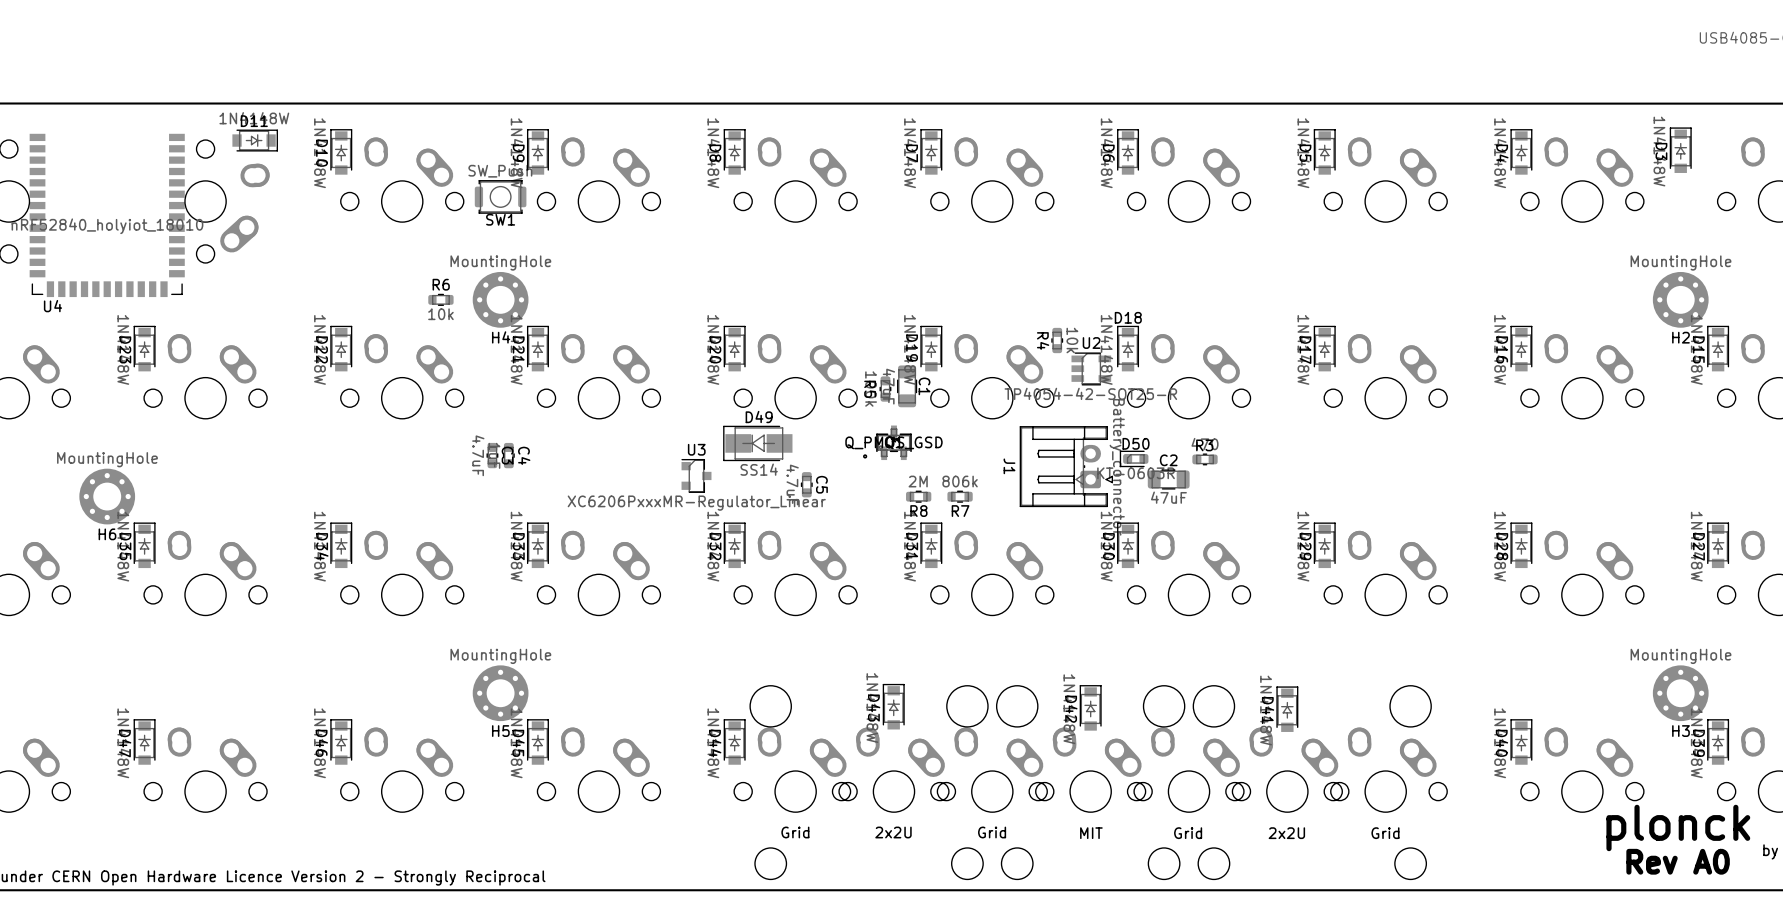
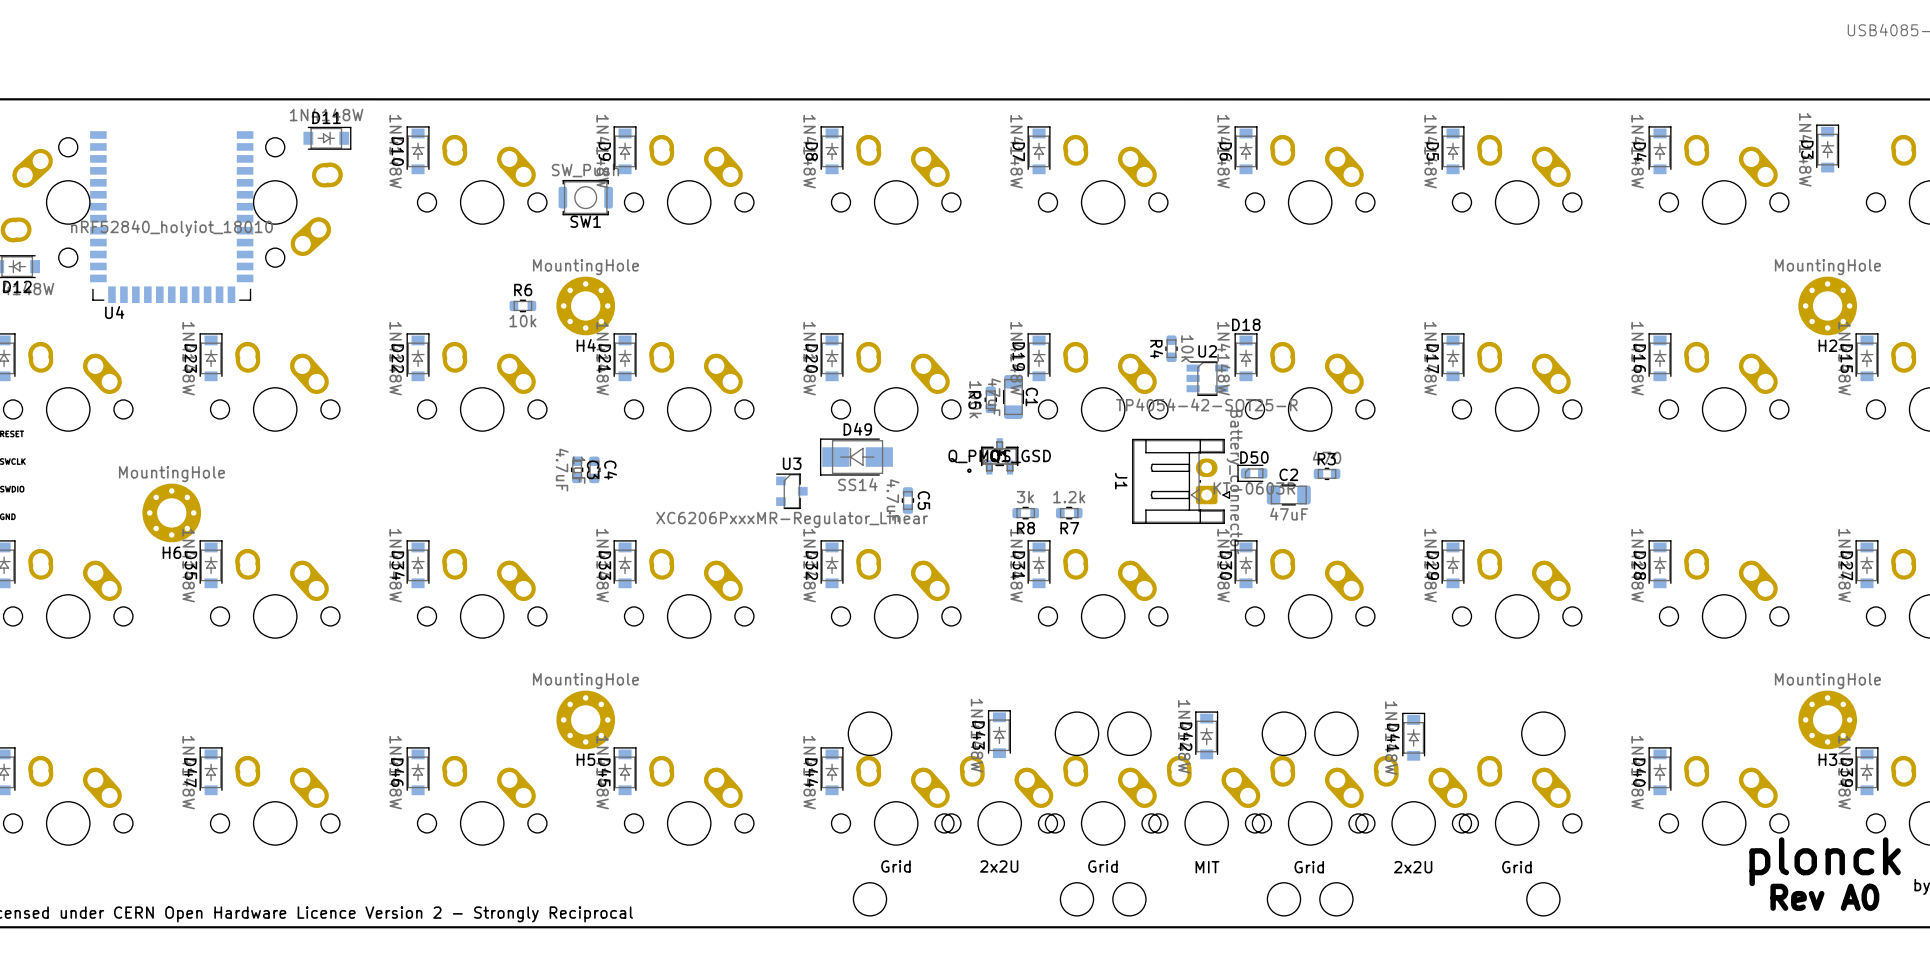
R8 value: 2M (918, 481) -> 3k (1025, 497)
R7 value: 806k (960, 481) -> 1.2k (1069, 497)

